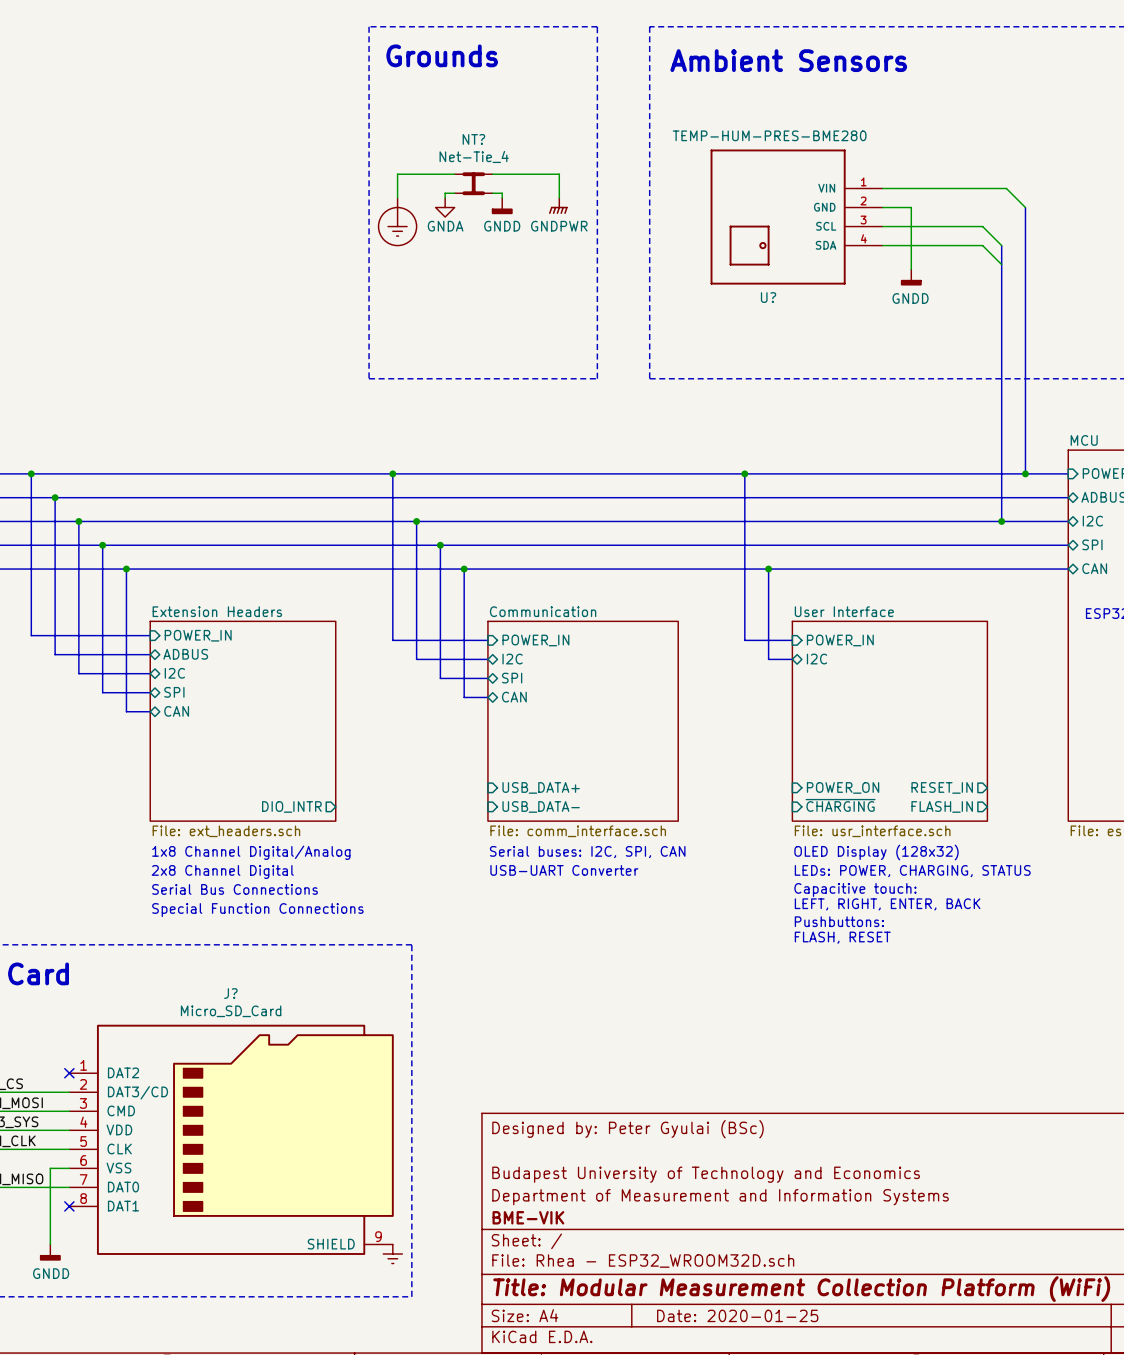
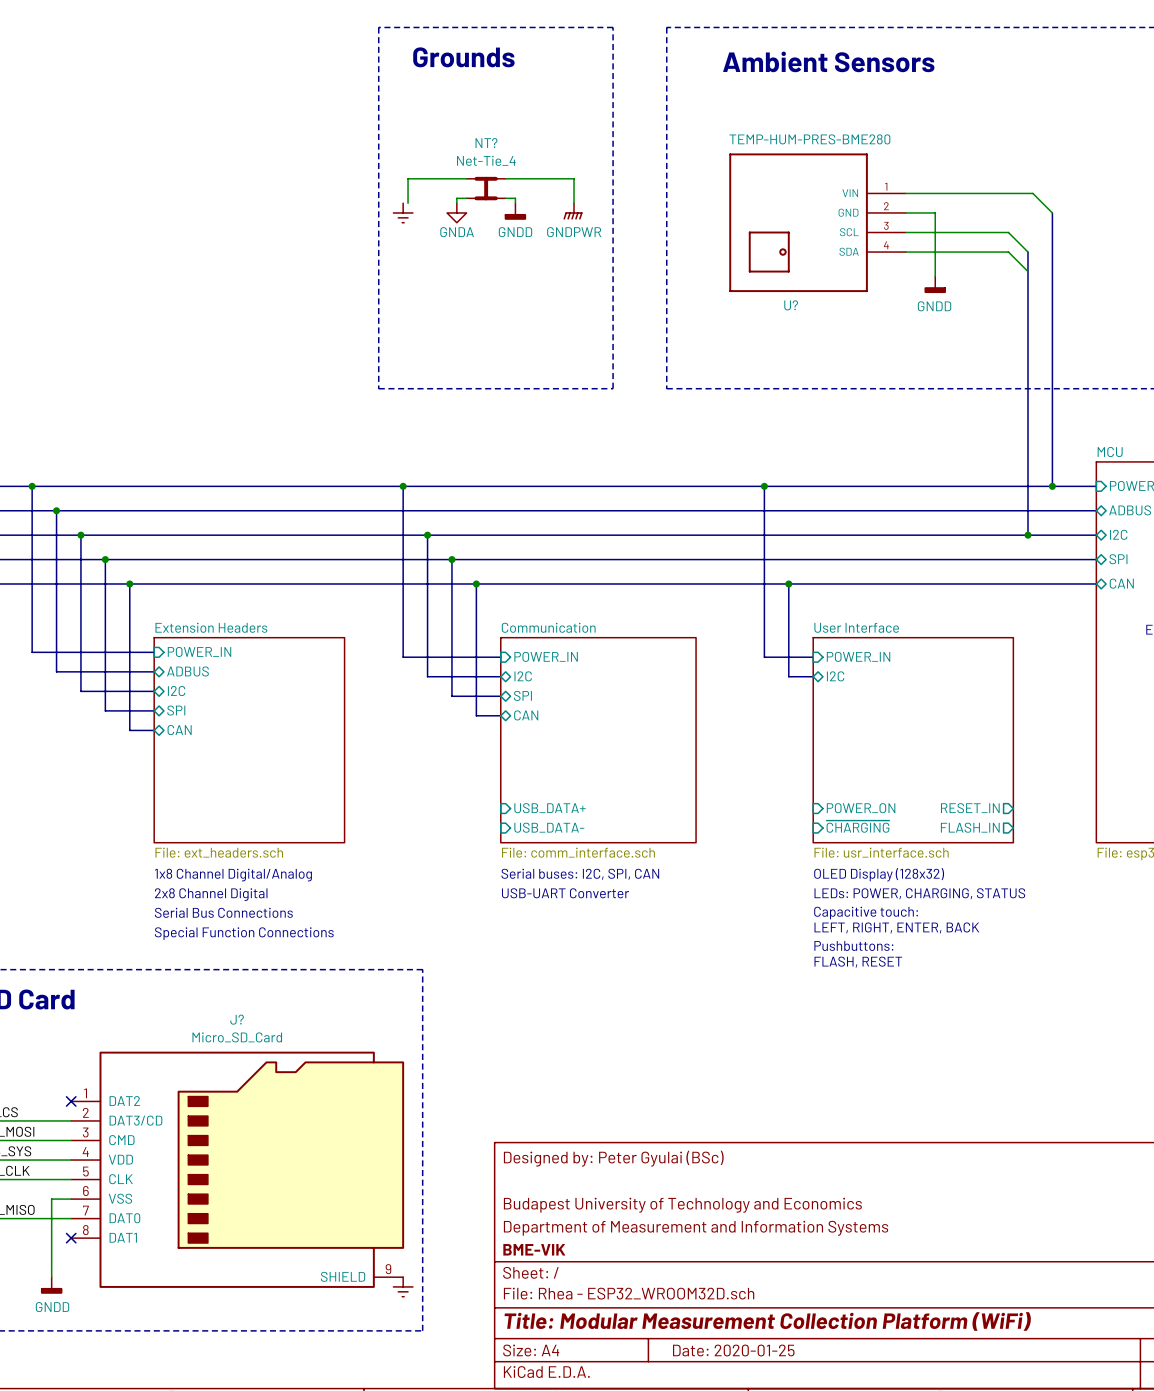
power symbol: none -> (403, 212)
power symbol: (397, 221) -> none
sheet pin: DIO_INTR (291, 806) -> none

